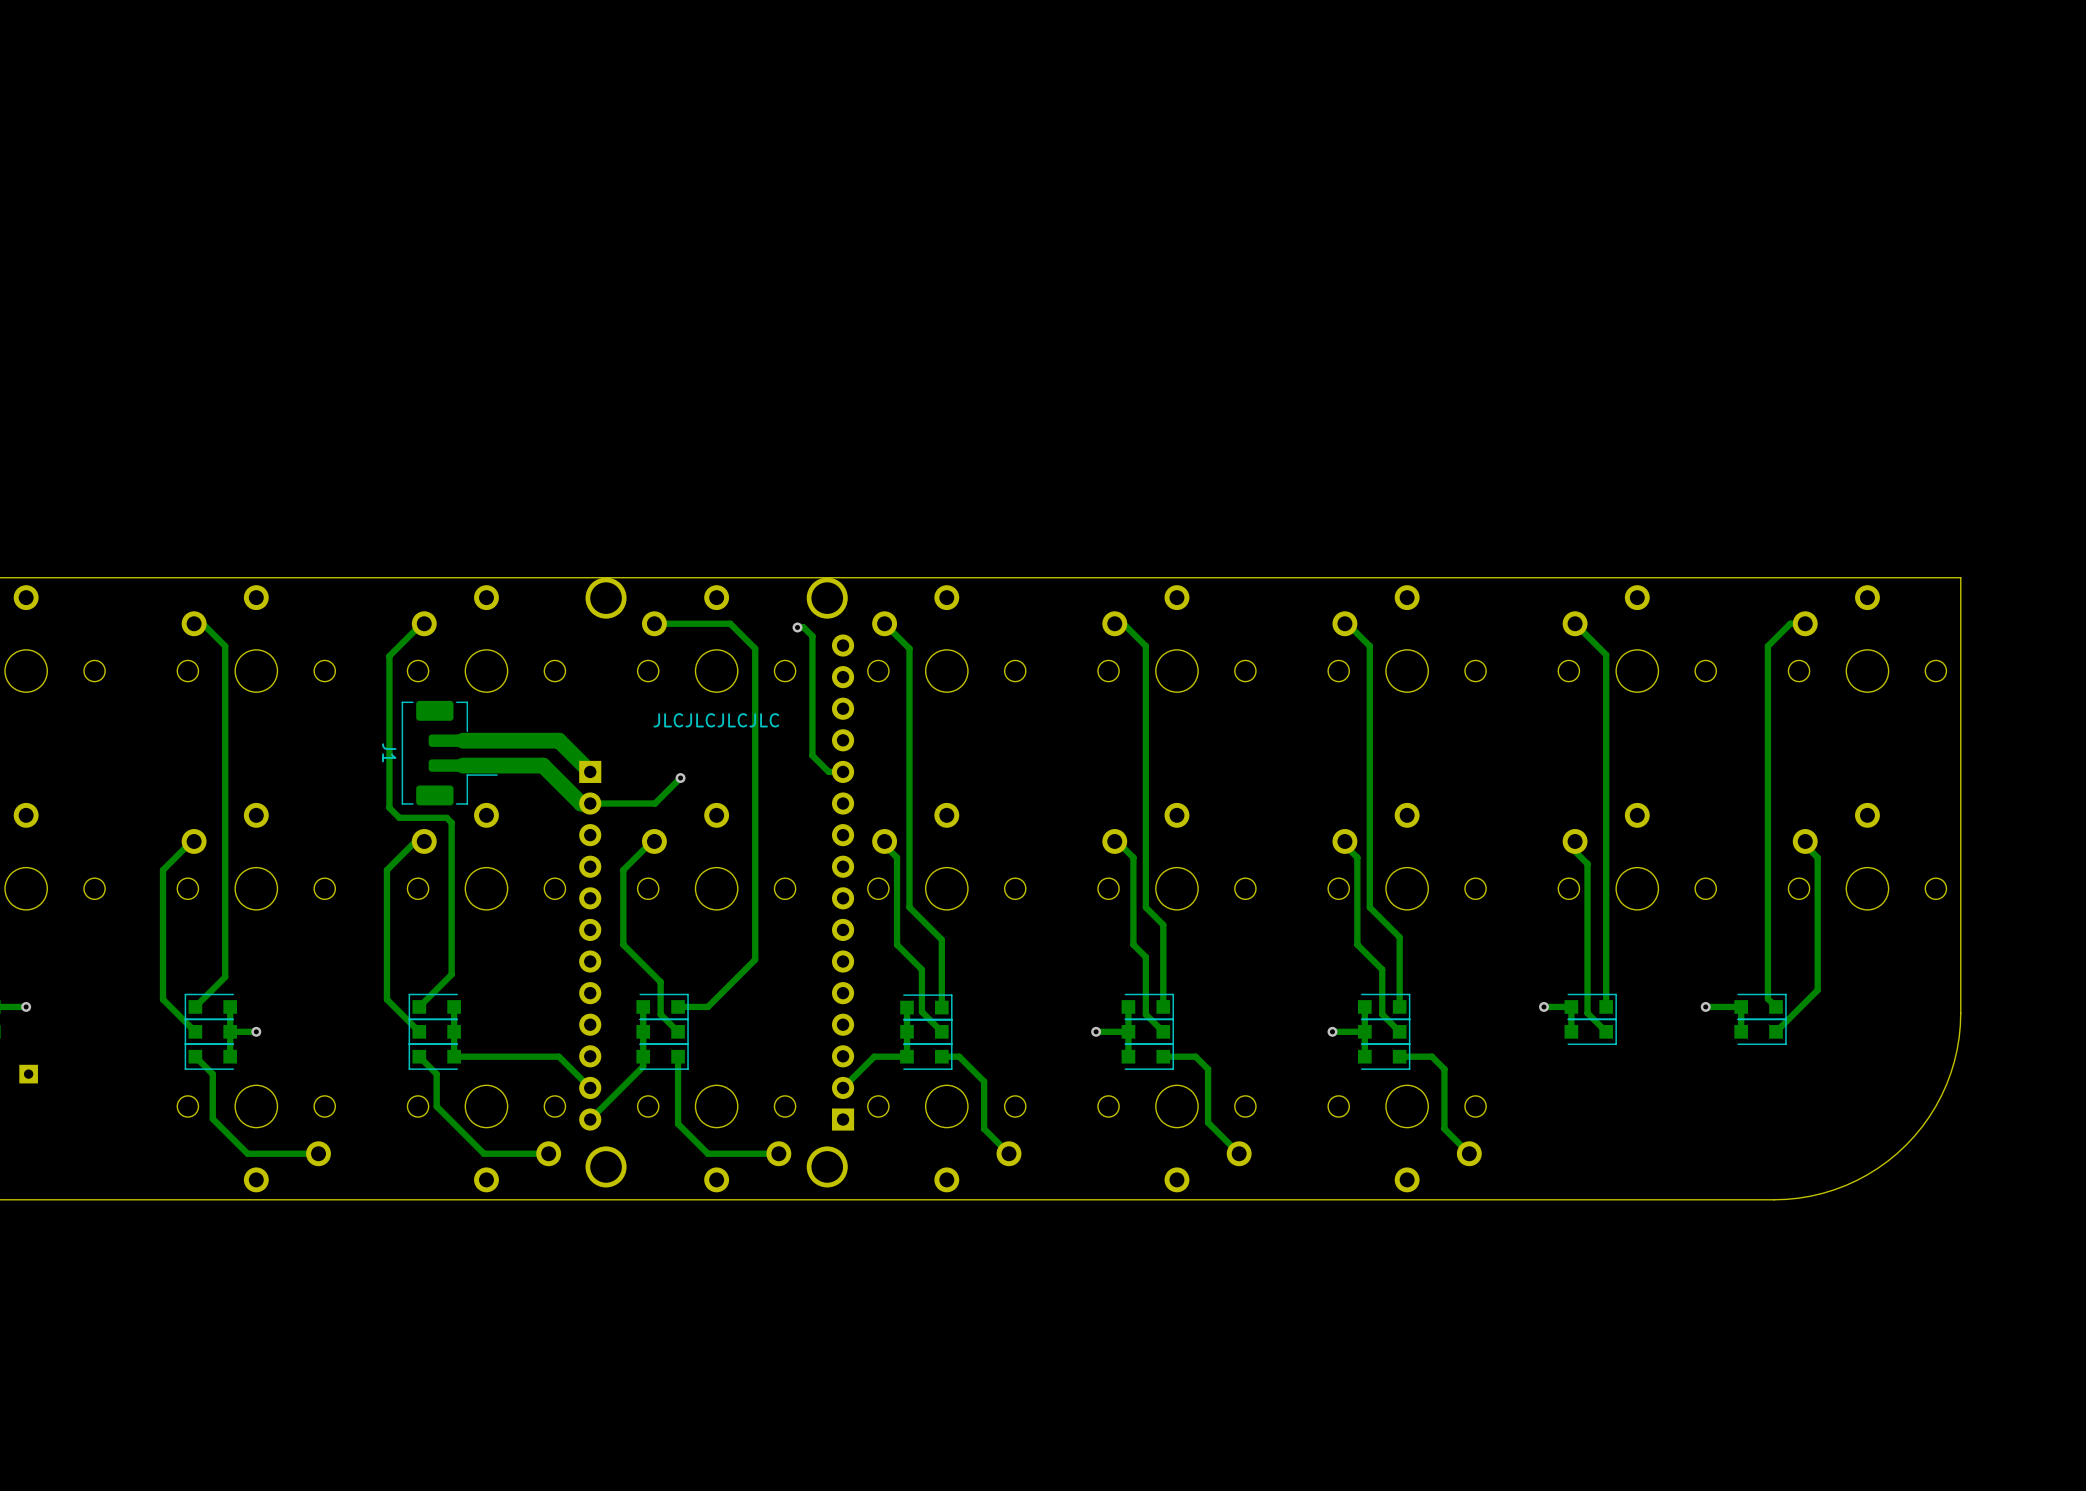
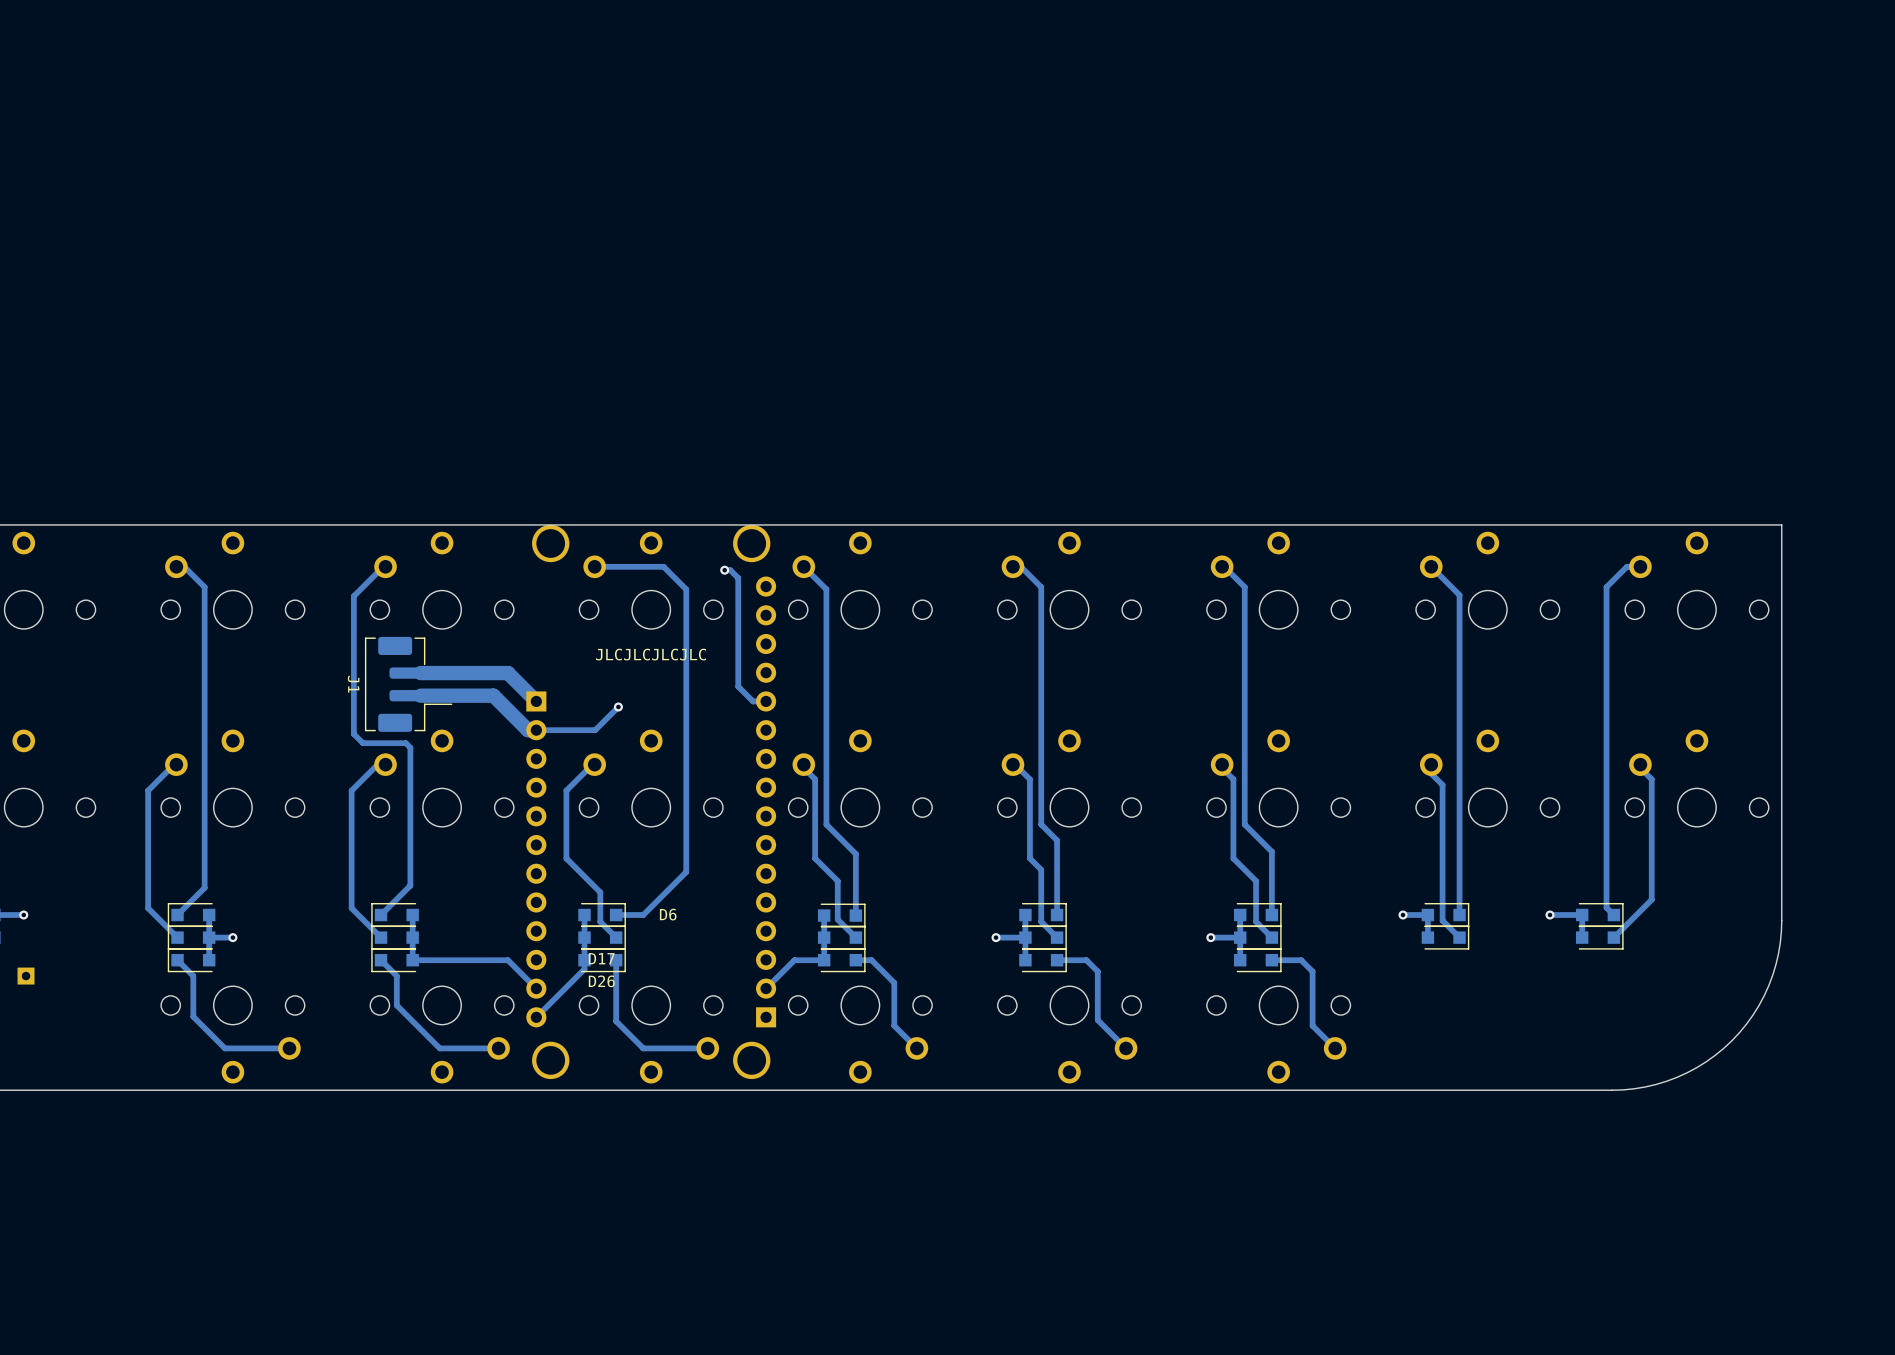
D6 name: none -> D6 (668, 914)
D17 name: none -> D17 (601, 958)
D26 name: none -> D26 (601, 981)

